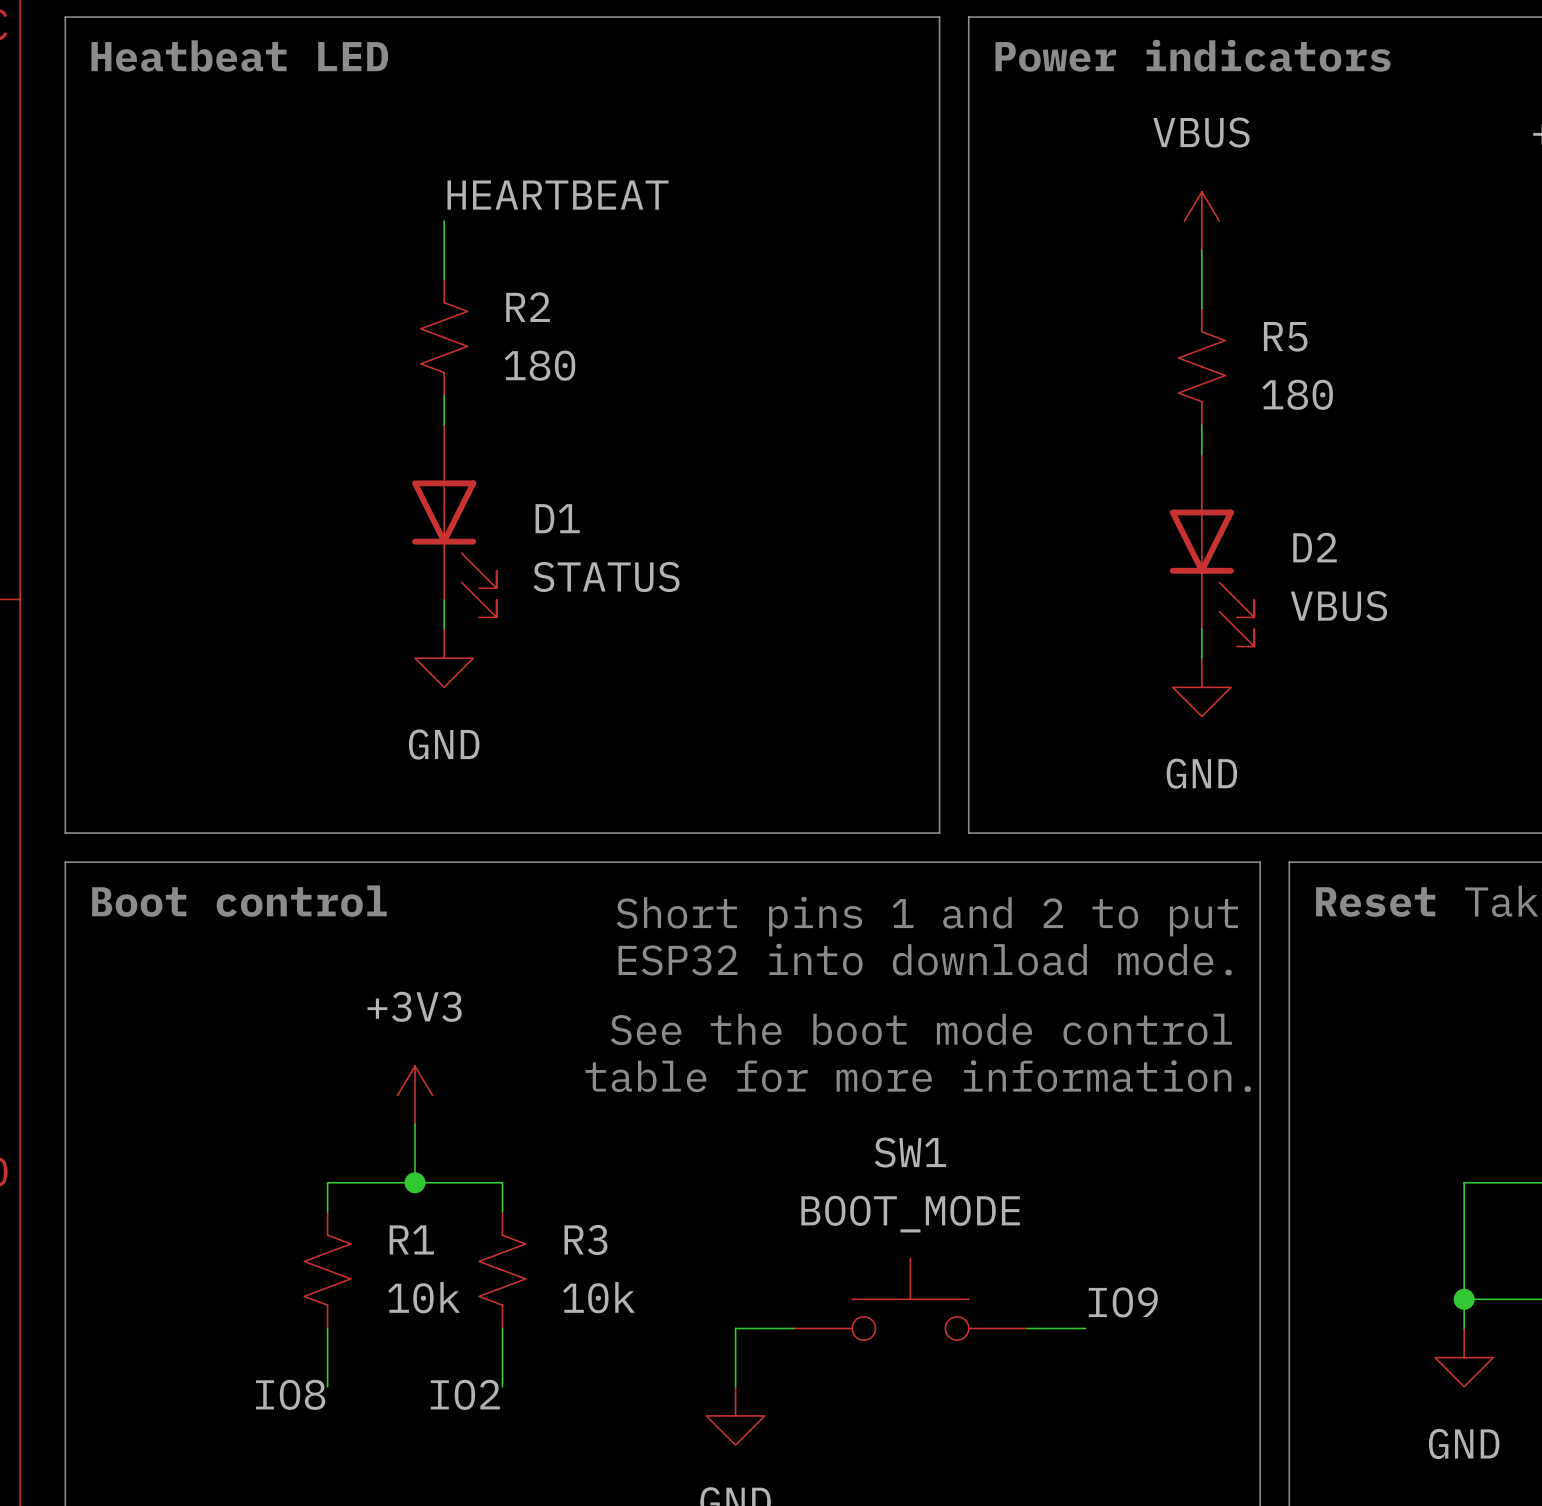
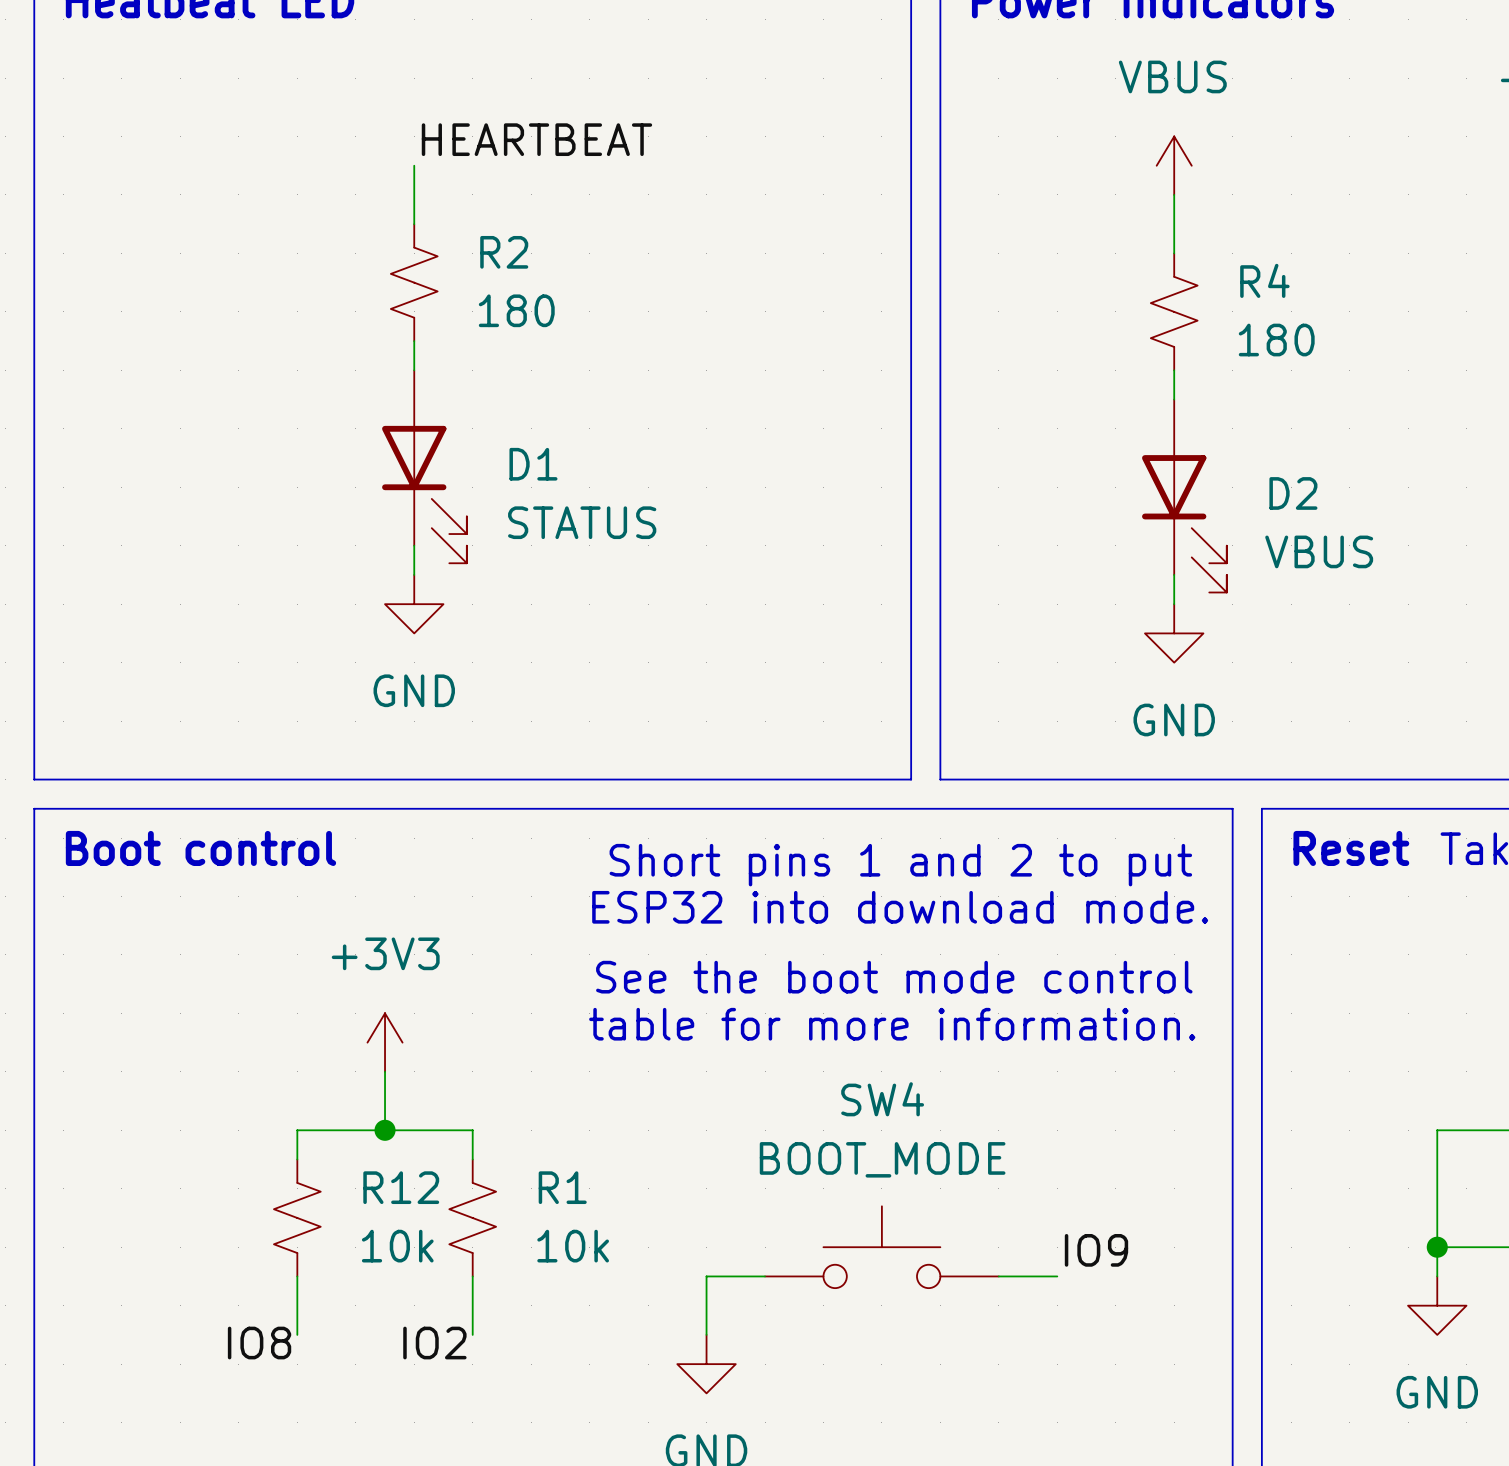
R5 name: R5 (1285, 336) -> R4 (1264, 280)
SW1 name: SW1 (910, 1152) -> SW4 (882, 1099)
R1 name: R1 (411, 1239) -> R12 (401, 1187)
R3 name: R3 (585, 1239) -> R1 (562, 1187)

